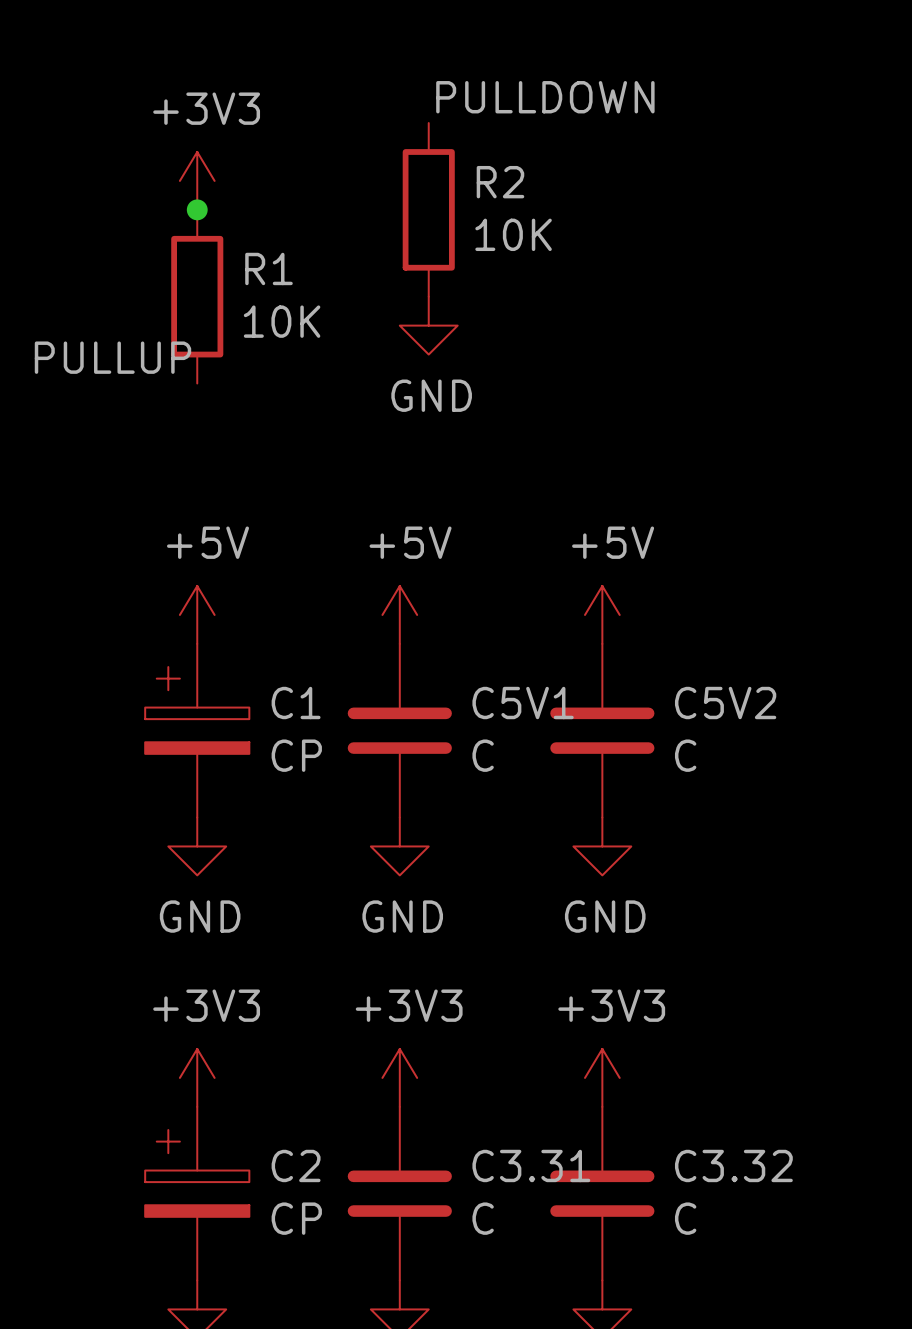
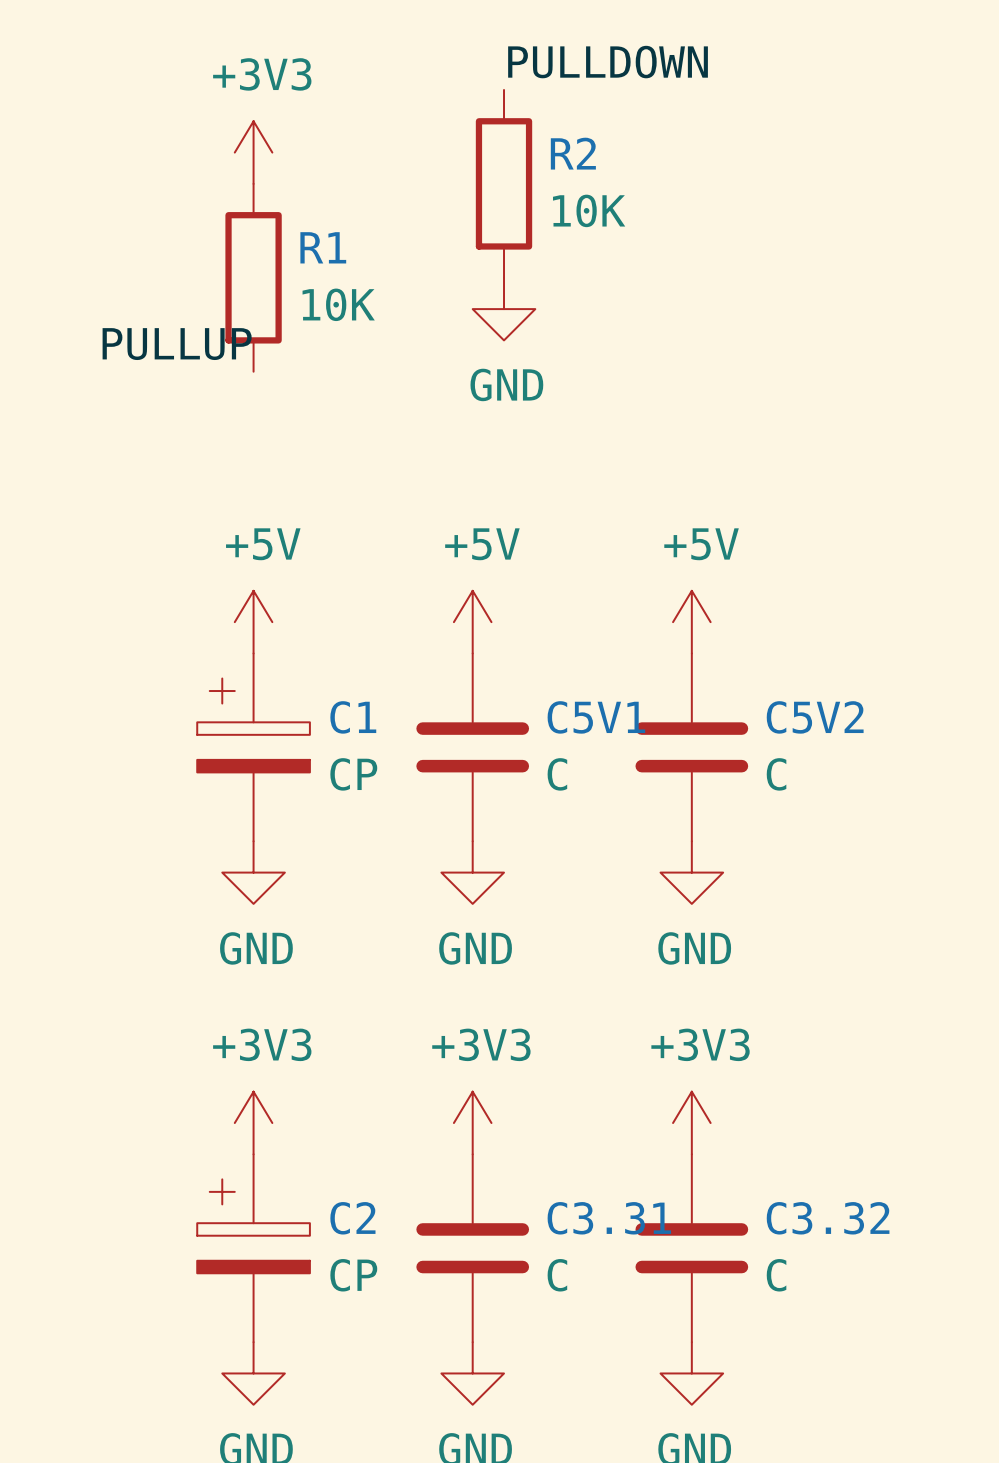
junction: (197, 209) -> none

